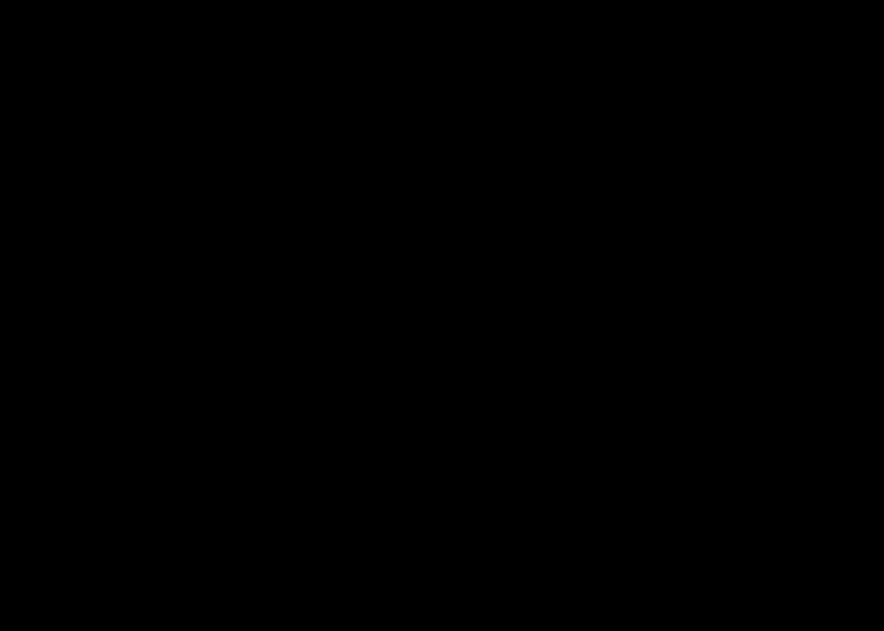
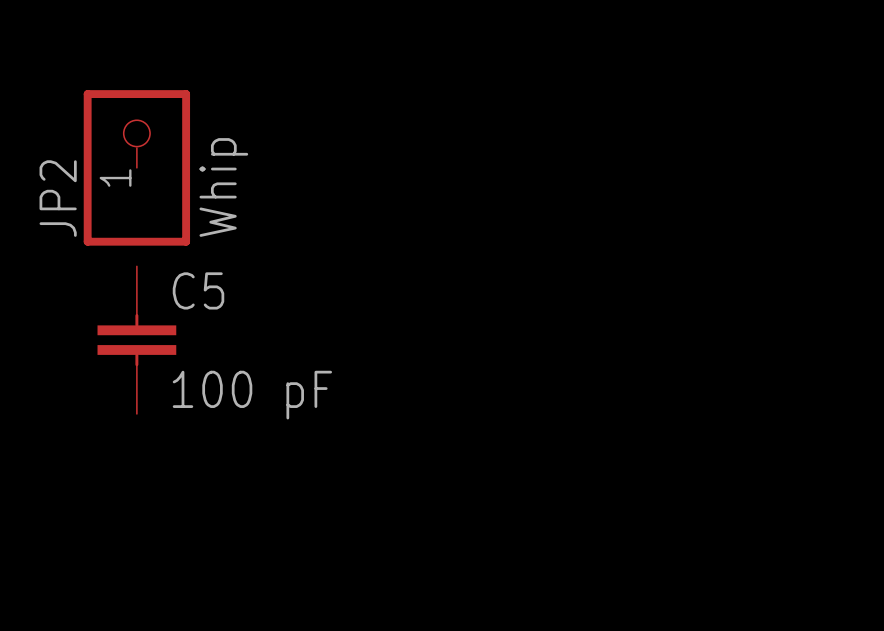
JP2: none -> Whip (136, 167)
C5: none -> 100 pF (136, 340)

